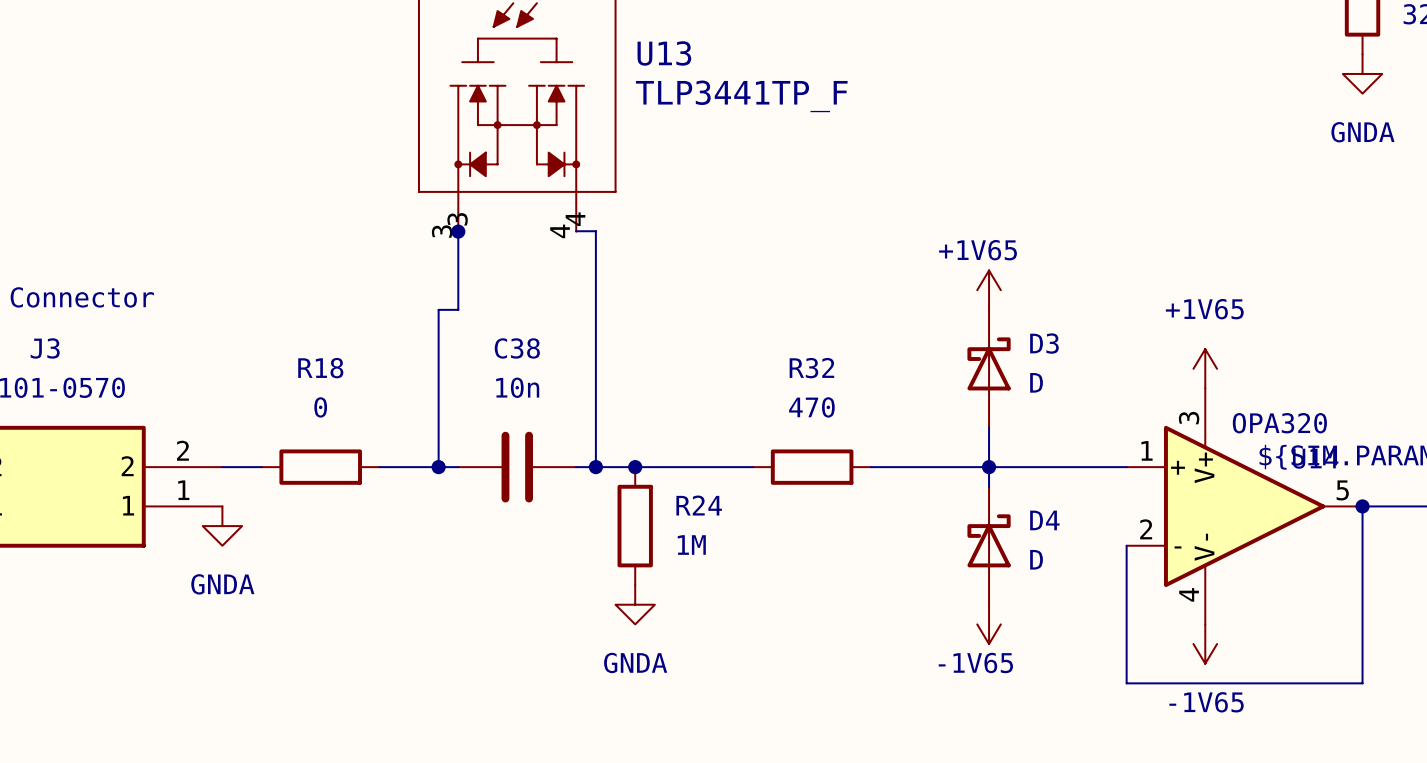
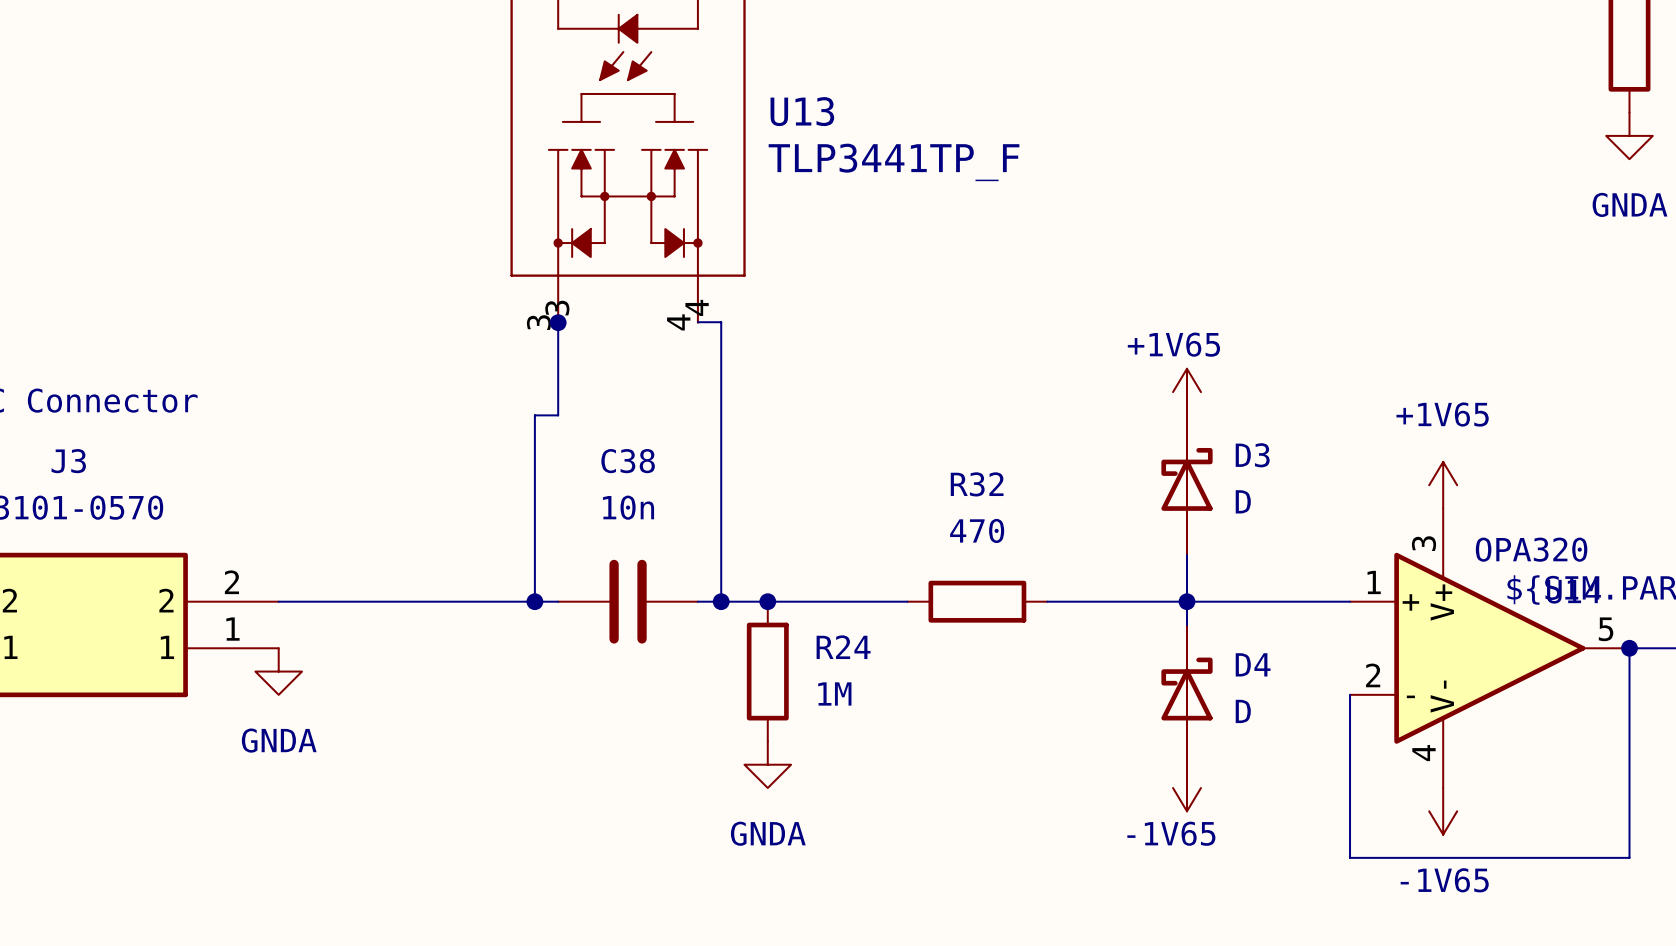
wire: none -> (325, 601) (465, 601)
R18: 0 (320, 467) -> none

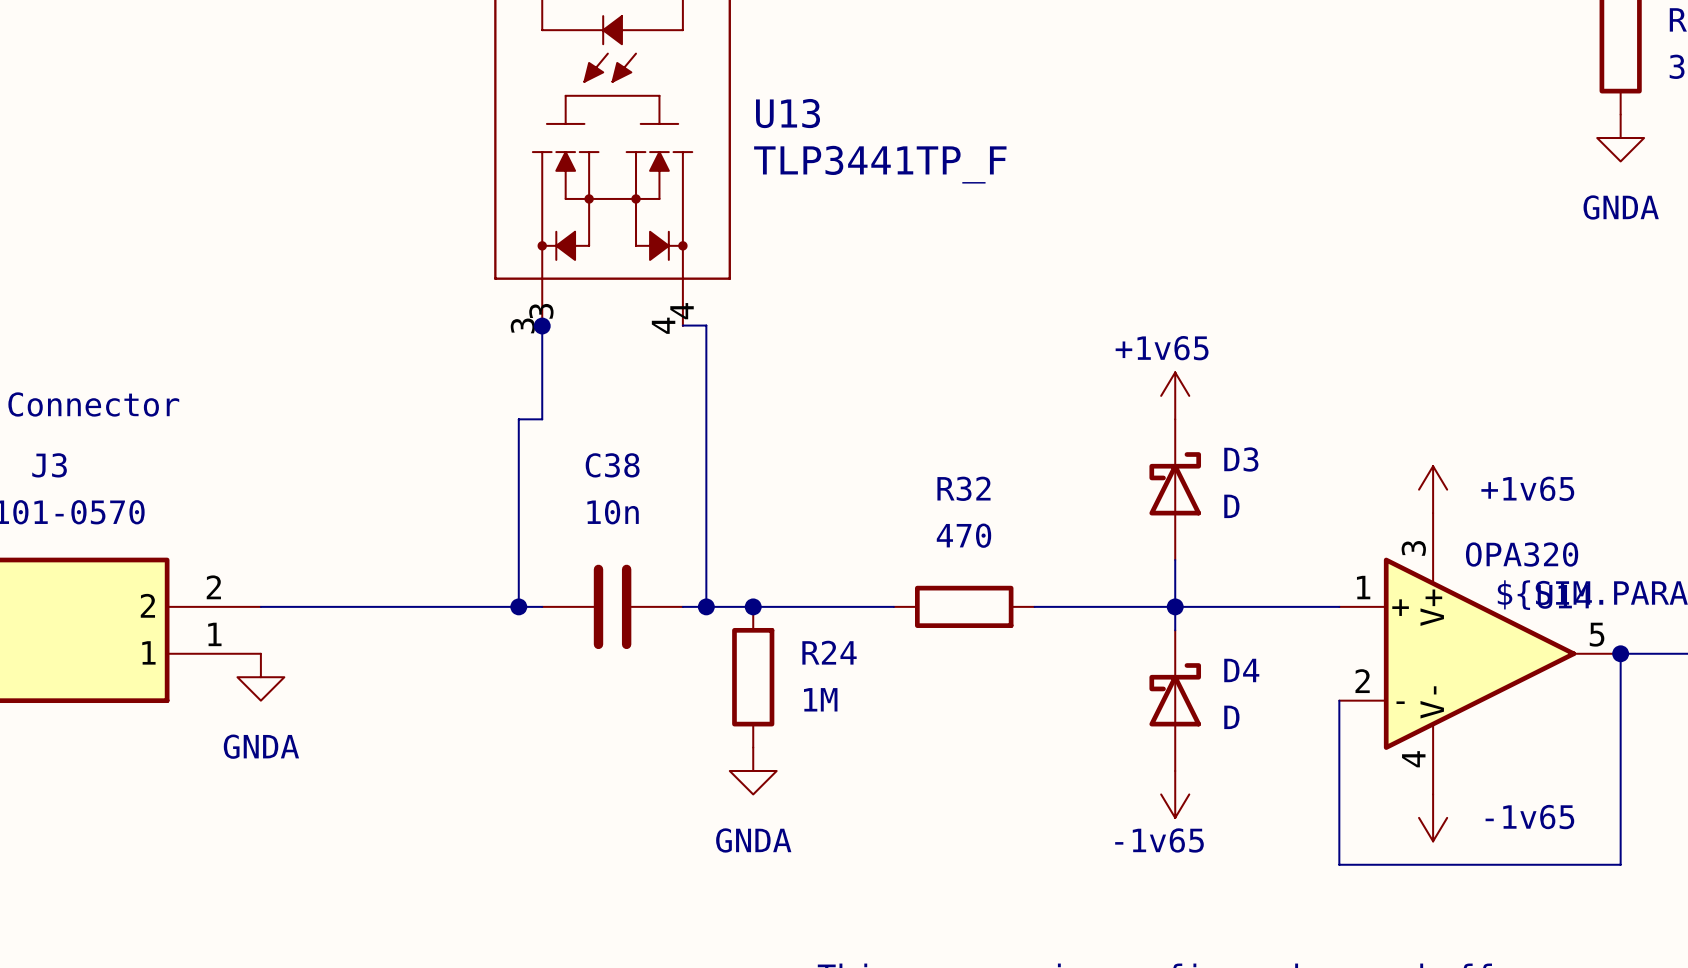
power symbol: +1V65 (1187, 392) -> +1v65 (1175, 395)
power symbol: +1V65 (1443, 485) -> +1v65 (1433, 489)
power symbol: -1V65 (1187, 788) -> -1v65 (1175, 794)
power symbol: -1V65 (1443, 811) -> -1v65 (1433, 817)

